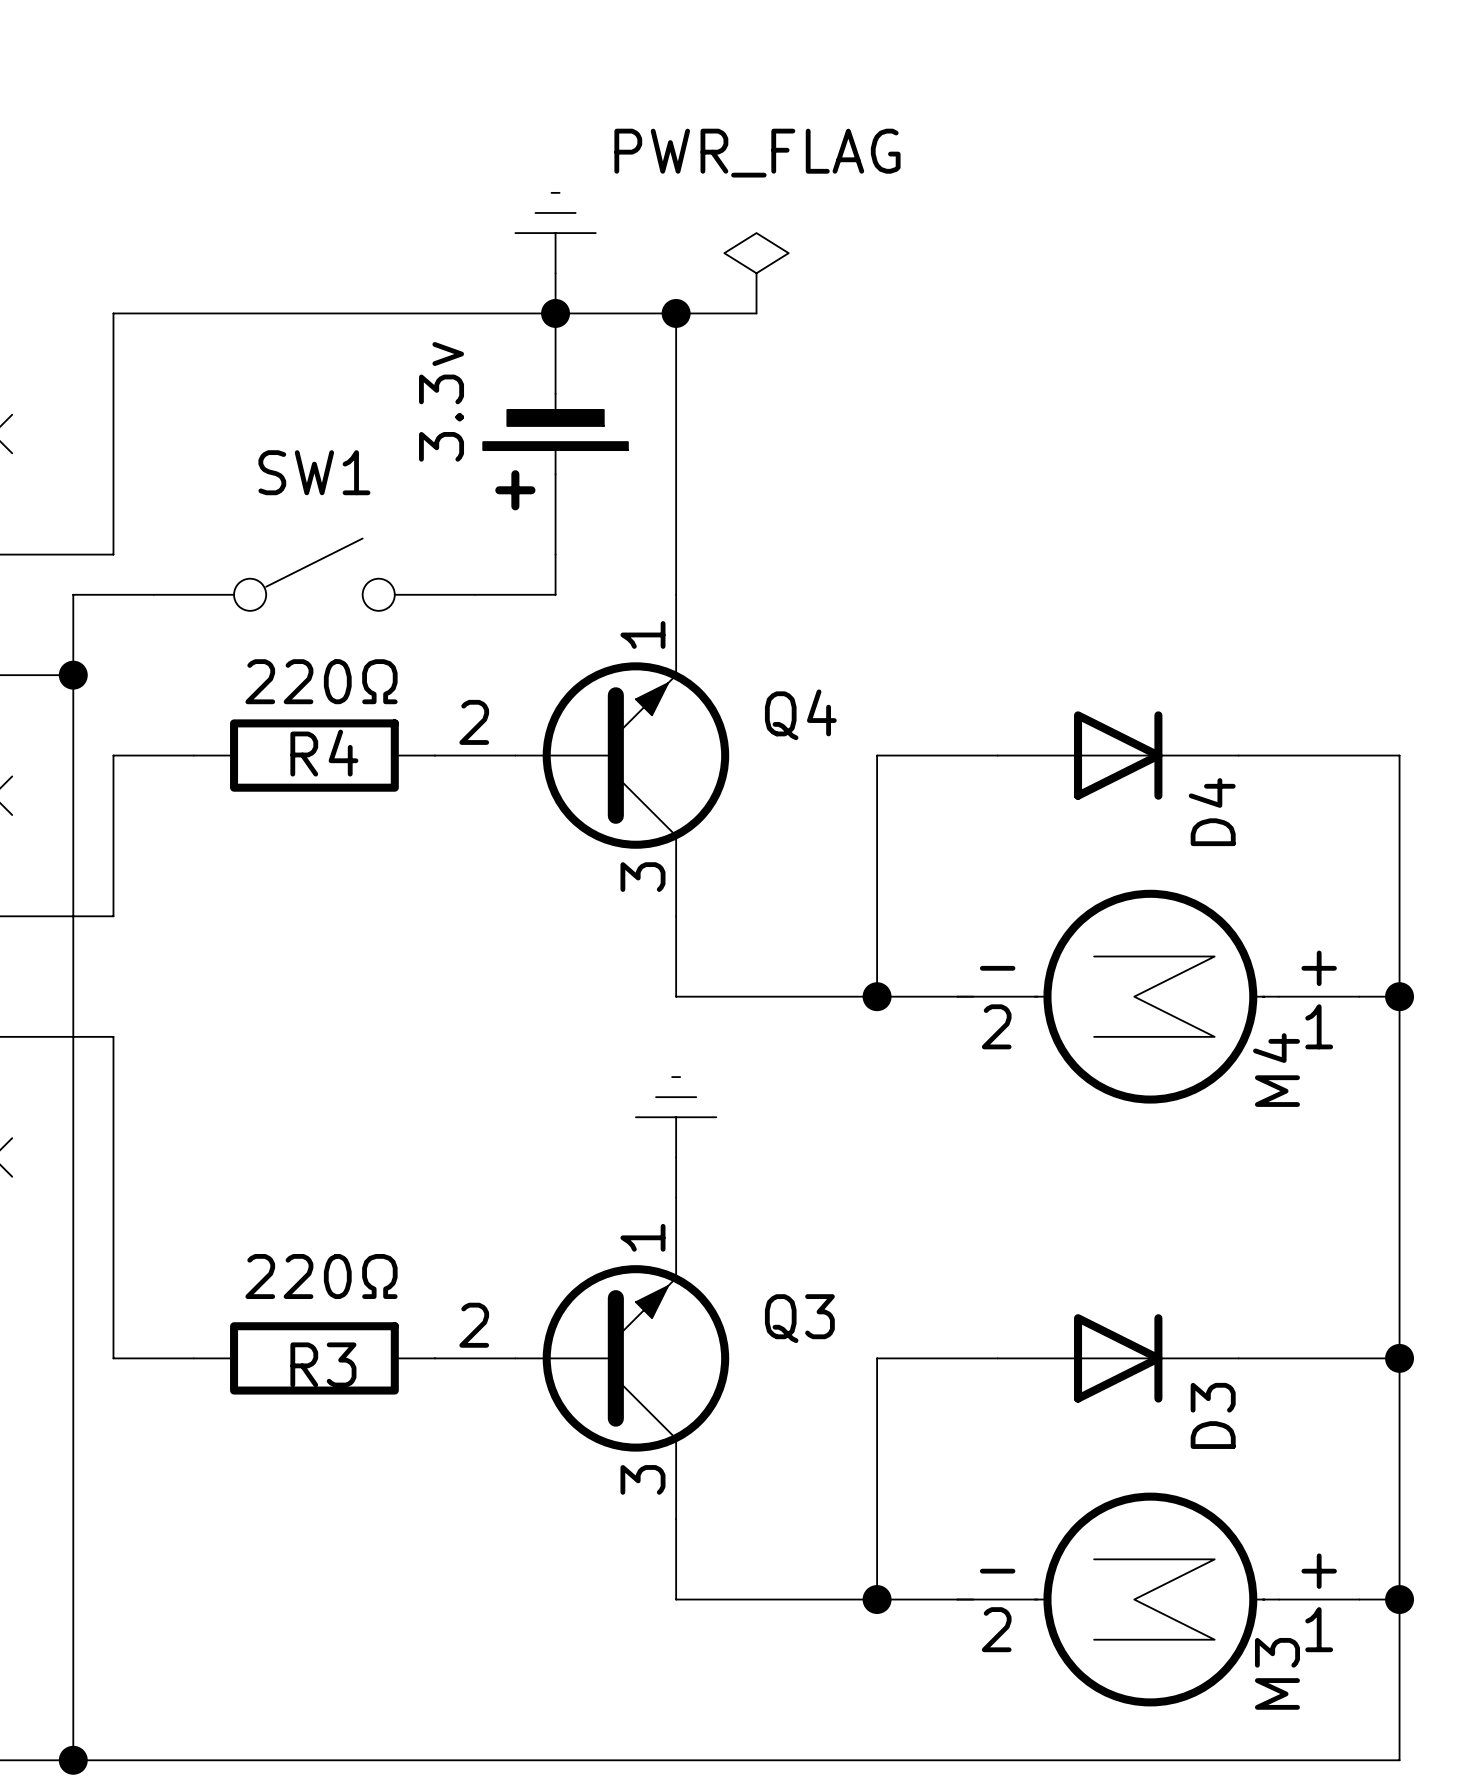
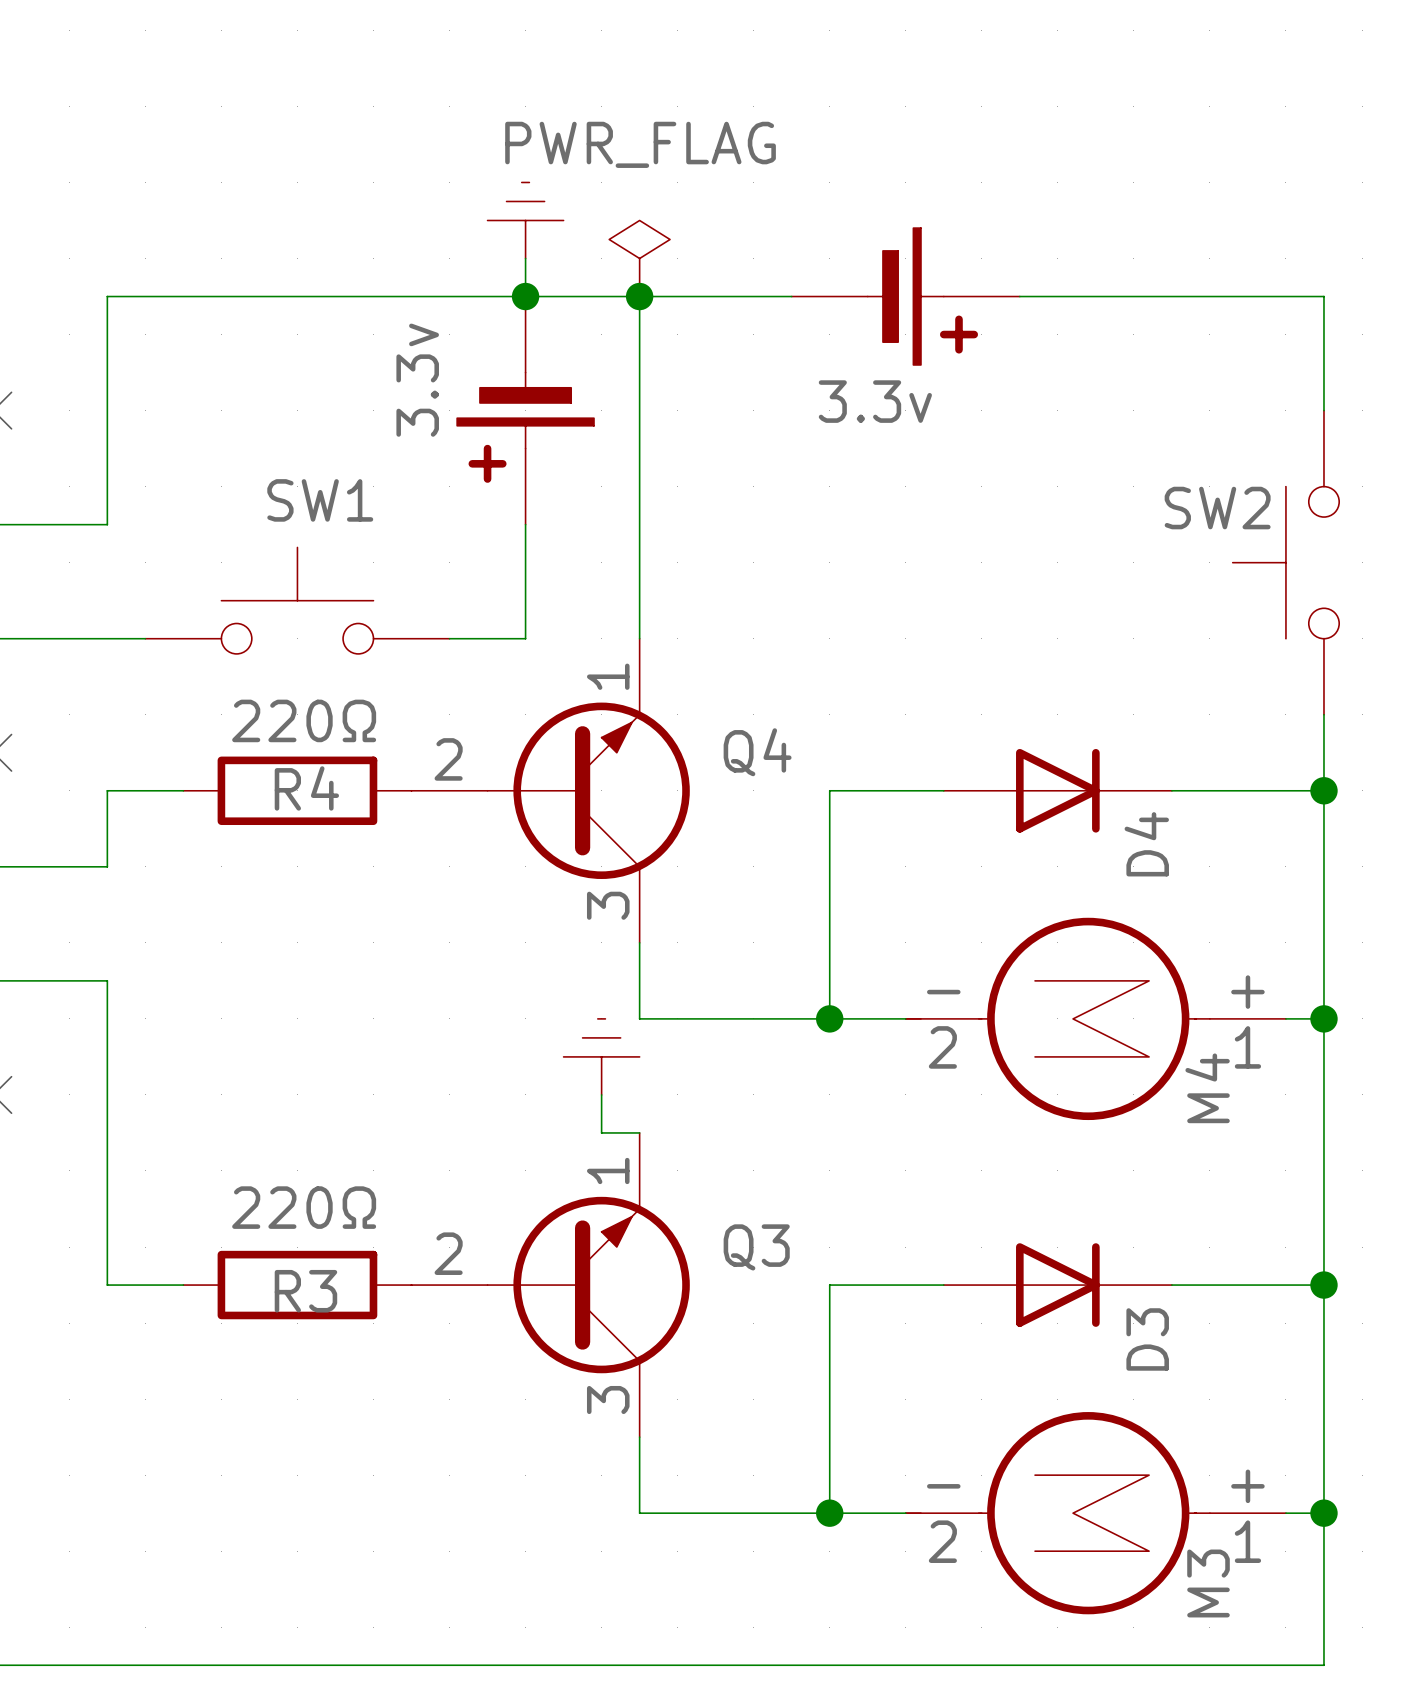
power symbol position: PWR_FLAG (756, 273) -> PWR_FLAG (639, 258)
wire: none -> (715, 296) (791, 296)
part: none -> 3.3v (905, 296)
wire: none -> (1019, 296) (1323, 296) (1323, 410)
SW1 symbol: [153, 538, 476, 611] -> [145, 547, 450, 654]
wire: (153, 594) (73, 594) (73, 1760) -> none
wire: (475, 594) (555, 594) -> (449, 638) (525, 638) (525, 562)
SW2: none -> (1285, 562)
wire: none -> (69, 638) (145, 638)
junction: (73, 675) -> none
wire: (193, 755) (113, 755) (113, 835) -> (183, 790) (107, 790)
R4 position: (314, 755) -> (297, 790)
Q4 position: (582, 755) -> (550, 790)
wire: (997, 755) (877, 755) (877, 835) -> (943, 790) (829, 790)
D4 position: (1118, 755) -> (1057, 790)
wire: (1238, 755) (1399, 755) -> (1171, 790) (1323, 790)
junction: none -> (1323, 790)
wire: (676, 916) (676, 996) (957, 996) -> (639, 942) (639, 1018) (905, 1018)
wire: none -> (829, 942) (829, 1018)
junction position: (877, 996) -> (829, 1018)
M4 position: (1158, 996) -> (1095, 1018)
wire: (1359, 996) (1399, 996) -> (1285, 1018) (1323, 1018)
junction: (1399, 996) -> none
junction: none -> (1323, 1018)
power symbol position: (676, 1117) -> (601, 1056)
wire: (676, 1157) (676, 1197) -> (601, 1094) (601, 1132) (639, 1132)
junction: (73, 1760) -> none

